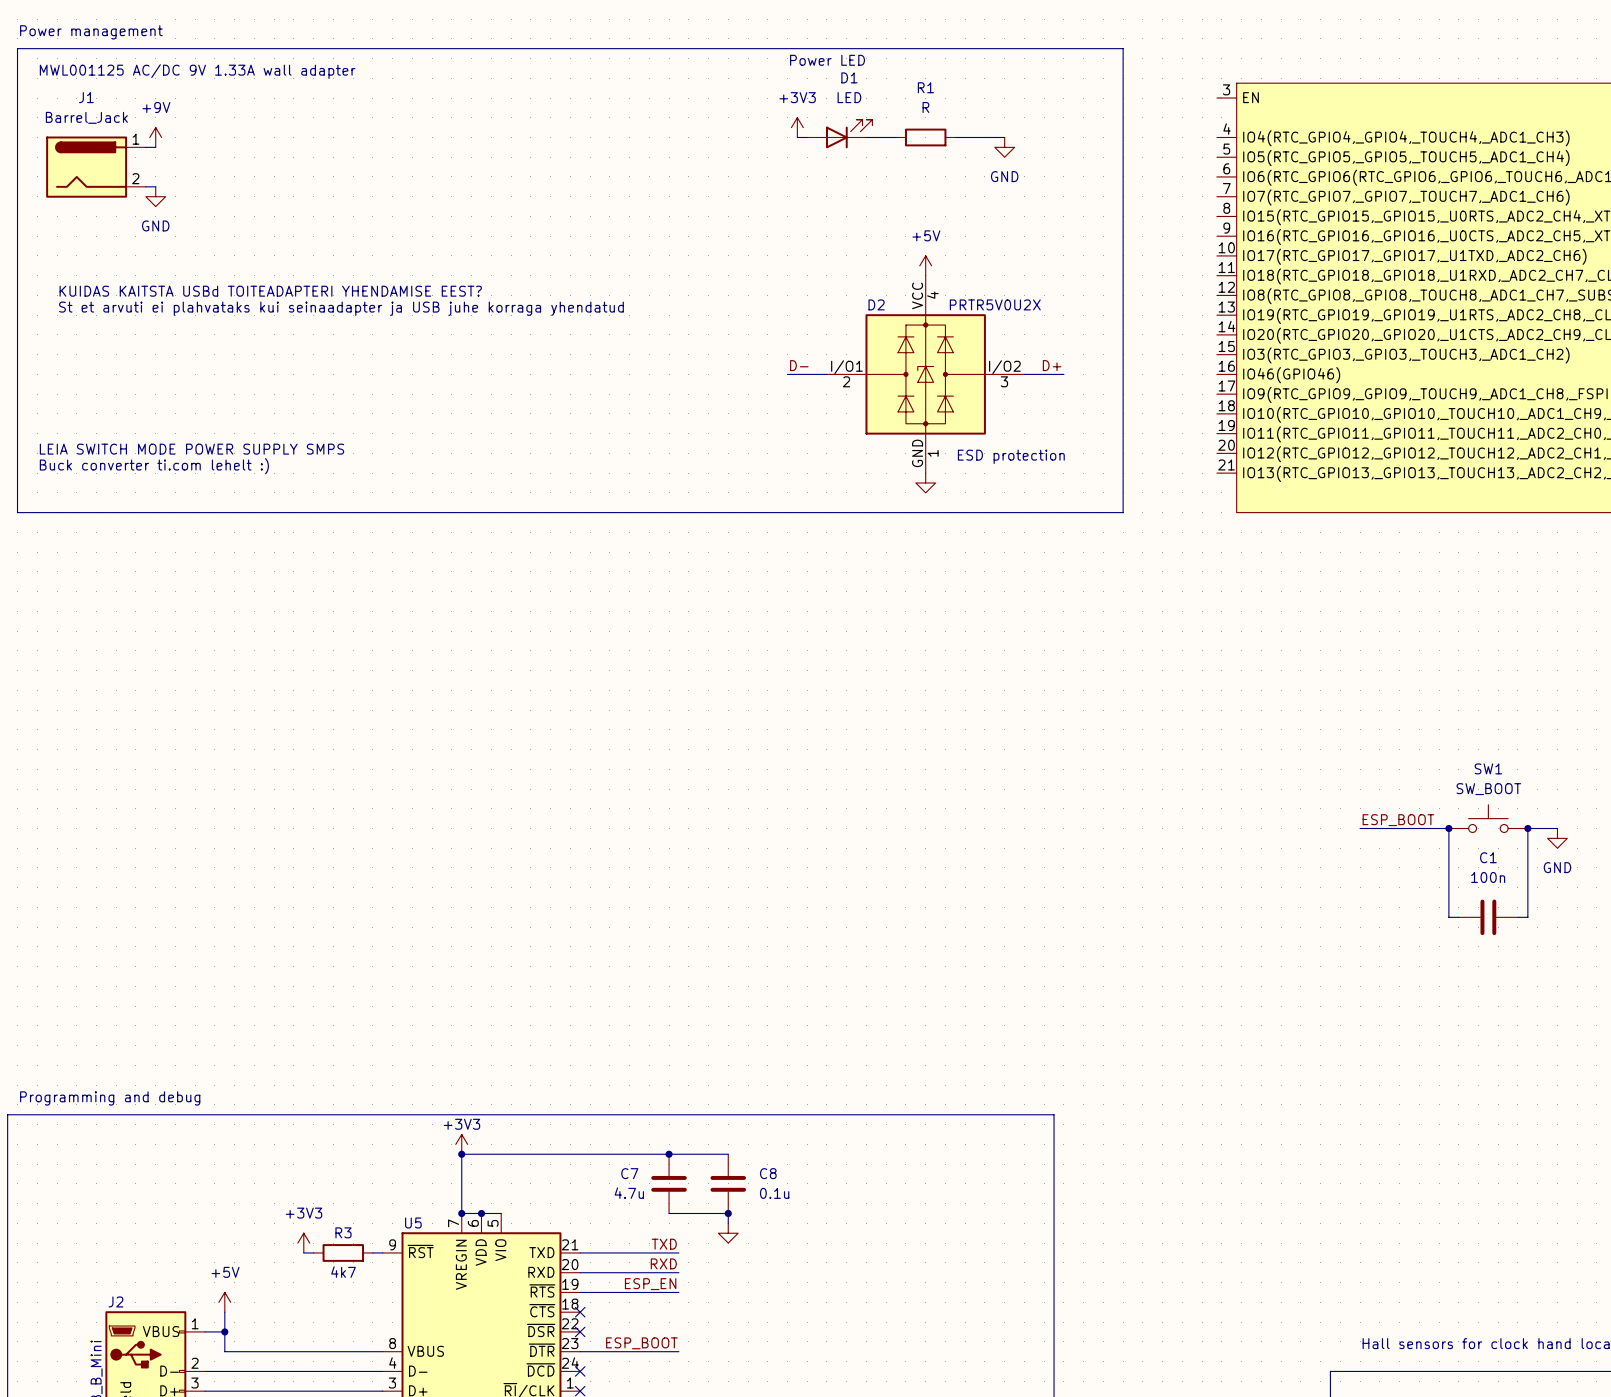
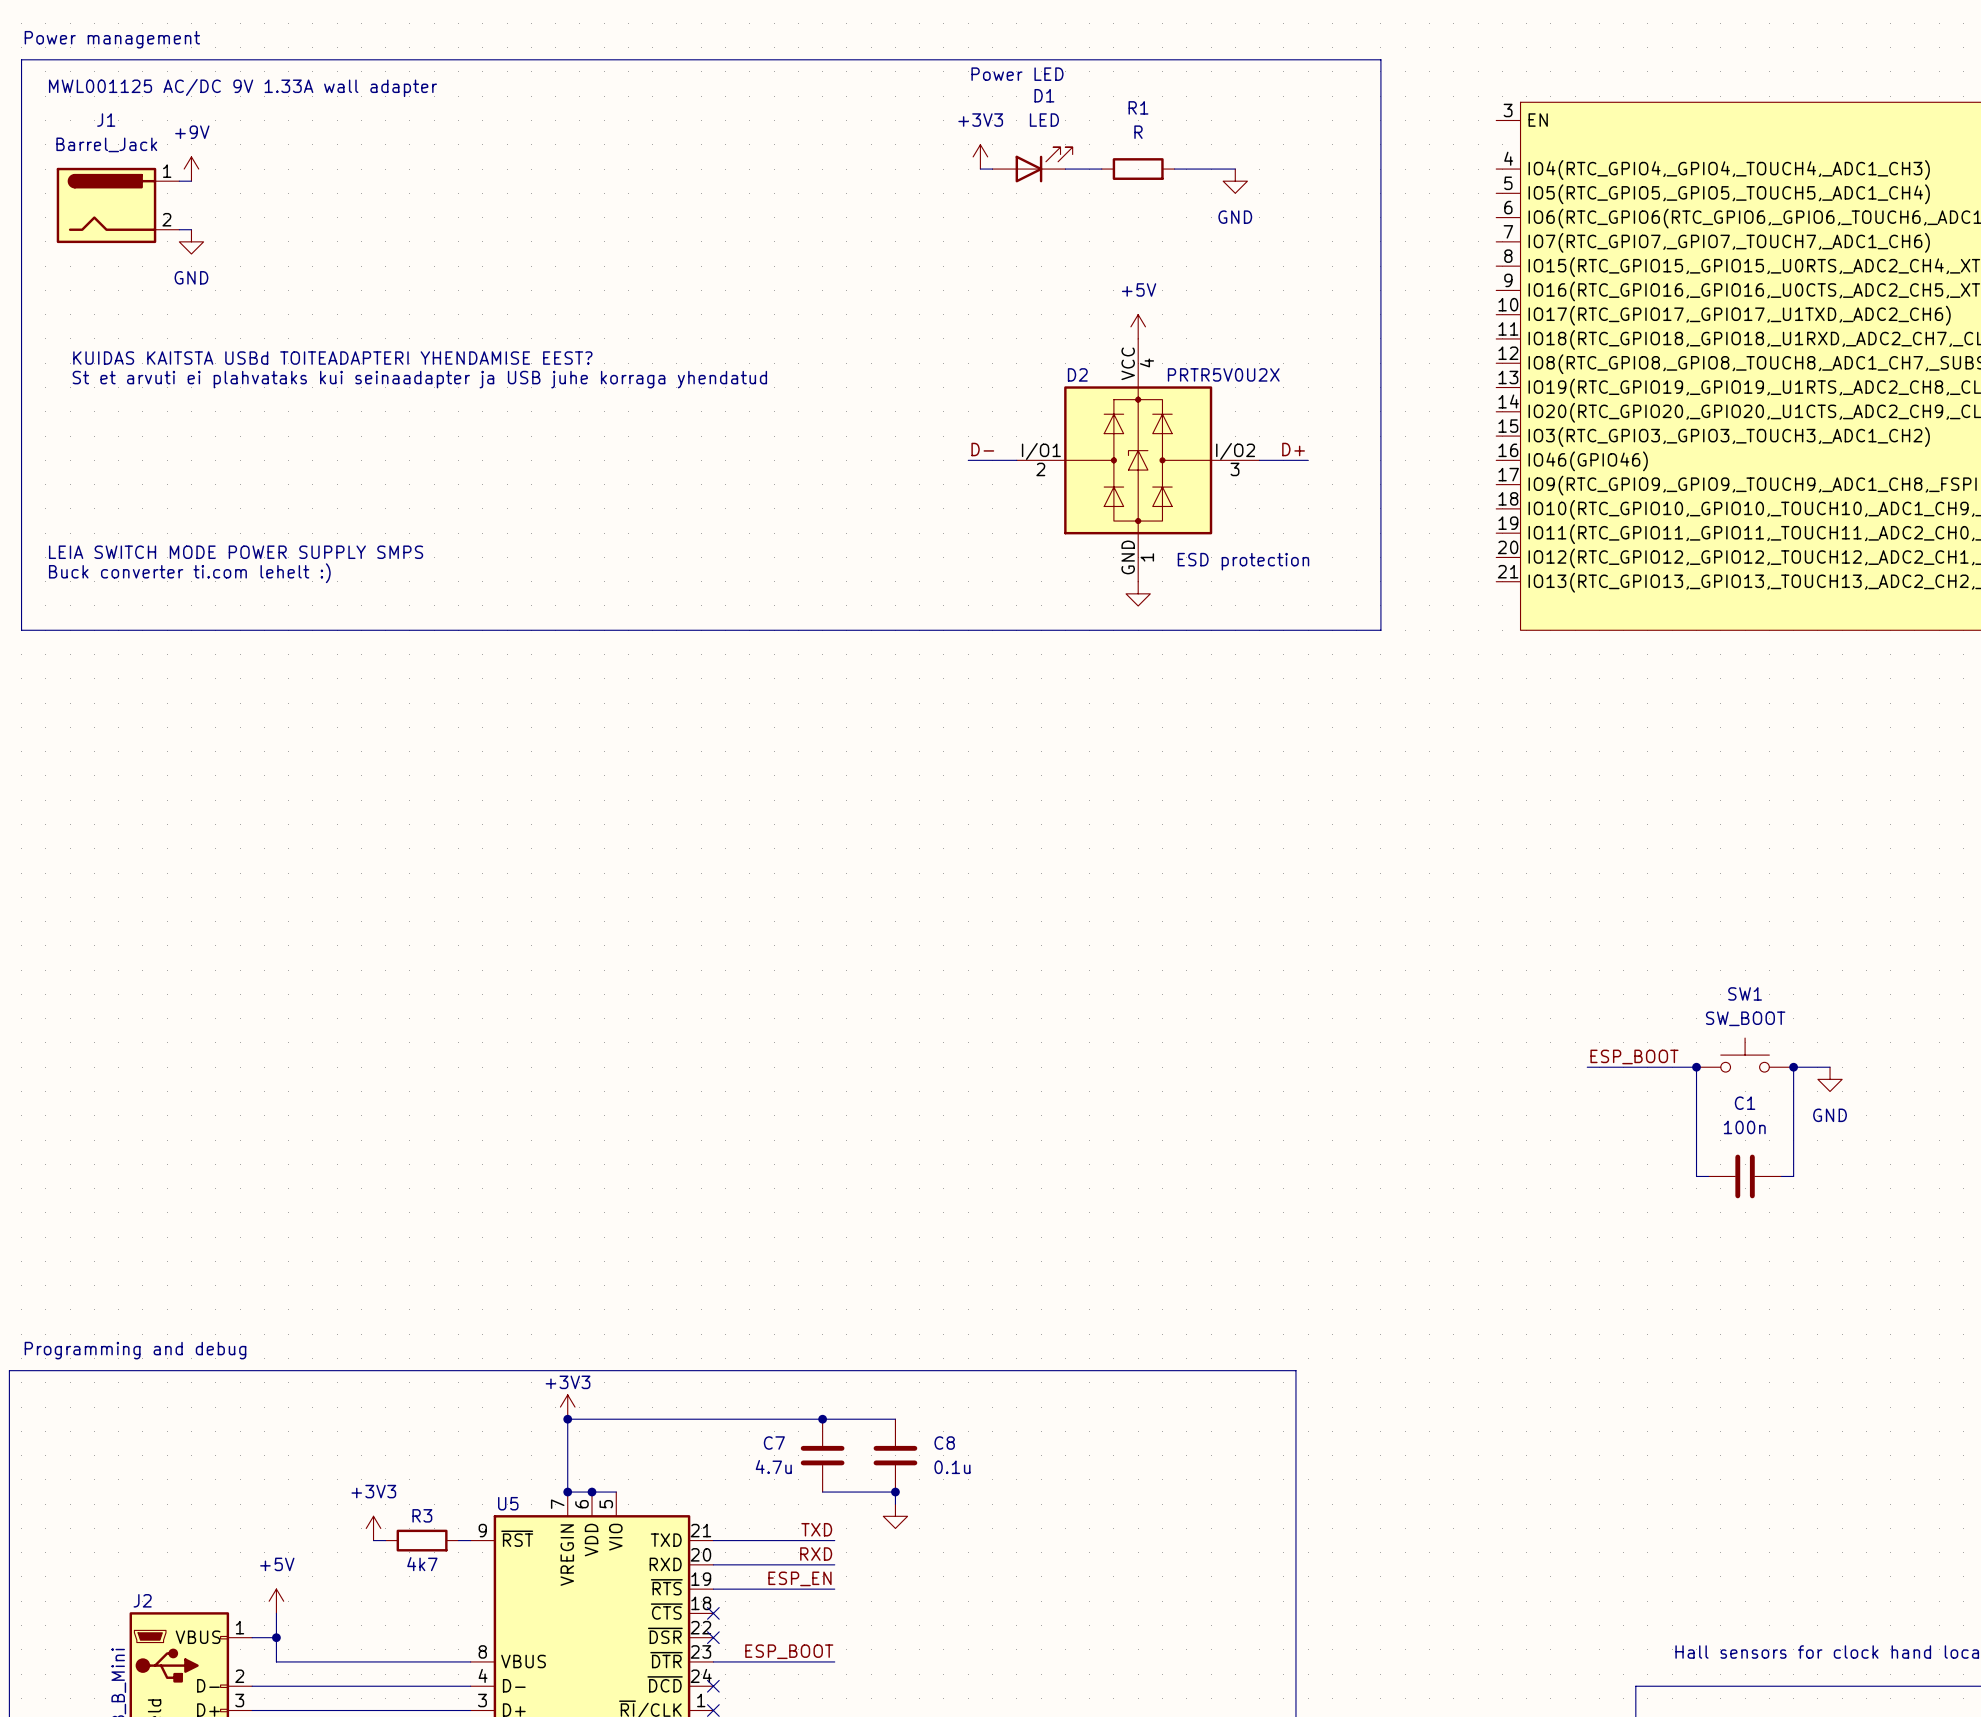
SW1 position: (1488, 818) -> (1745, 1055)
label position: ESP_BOOT (1398, 820) -> ESP_BOOT (1634, 1056)
wire: (1360, 828) (1448, 828) (1448, 917) (1458, 917) -> (1587, 1067) (1696, 1067) (1696, 1176) (1708, 1176)
junction: (1448, 828) -> none
junction: (1527, 828) -> none
wire: (1557, 828) (1527, 828) (1527, 917) (1517, 917) -> (1830, 1067) (1793, 1067) (1793, 1176) (1781, 1176)
power symbol position: GND (1557, 838) -> GND (1830, 1079)
junction: none -> (1696, 1067)
junction: none -> (1793, 1067)
C1 position: (1488, 917) -> (1745, 1176)

